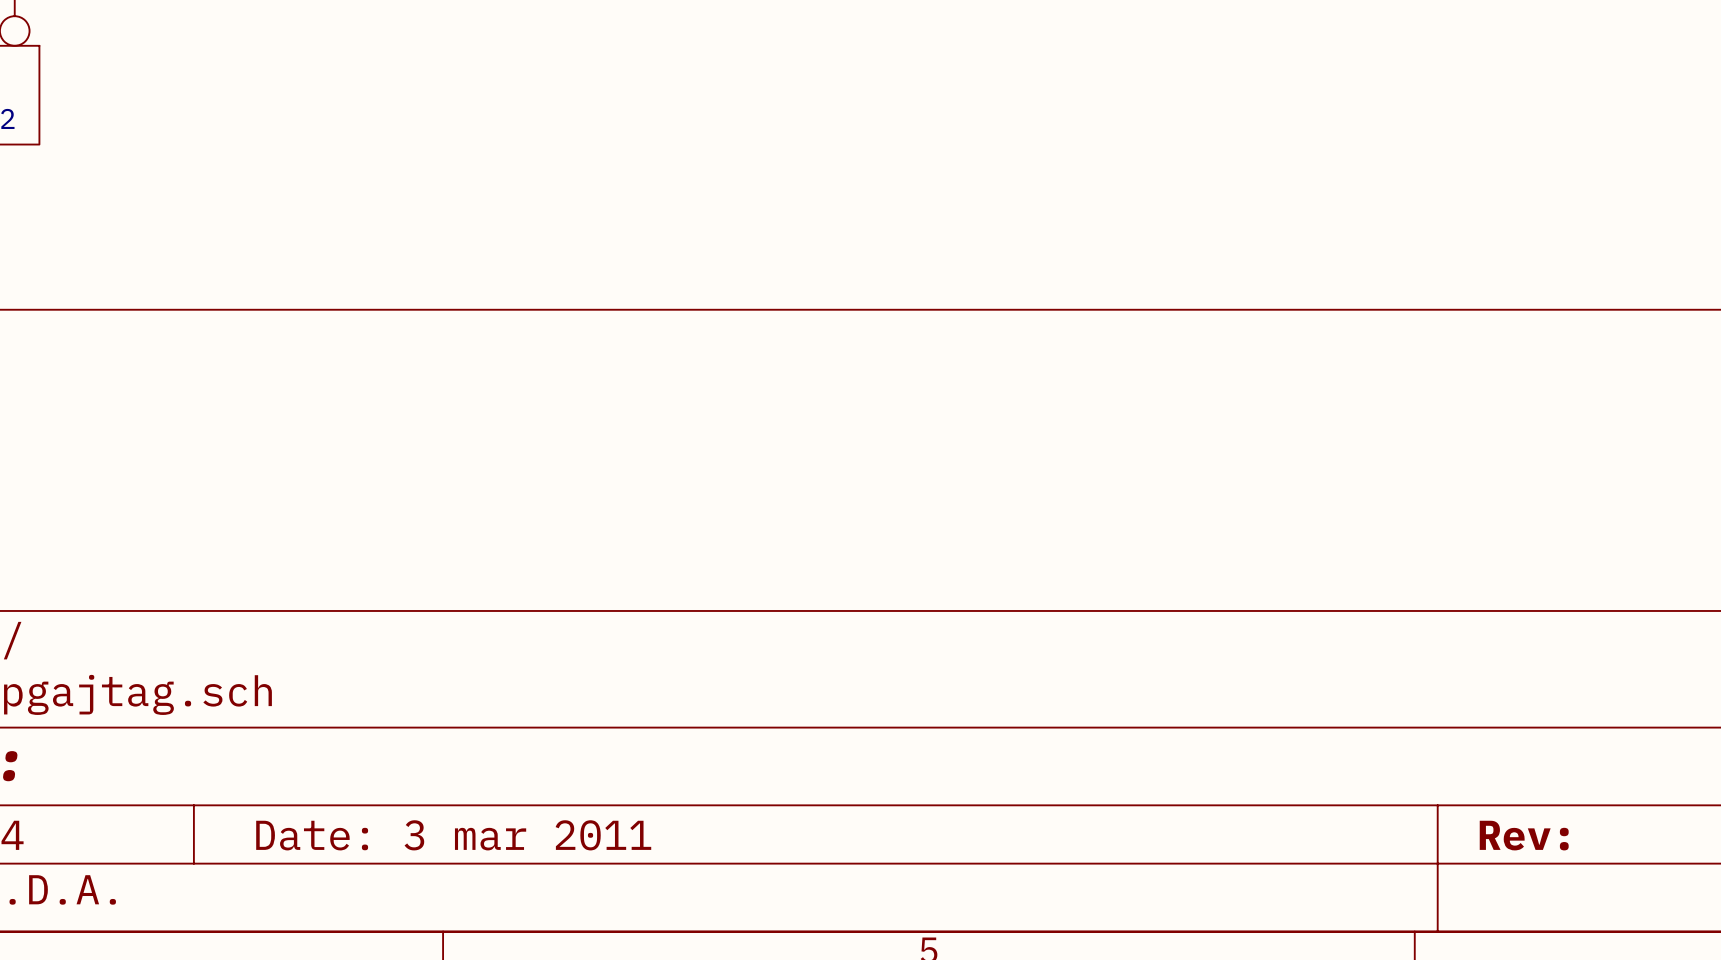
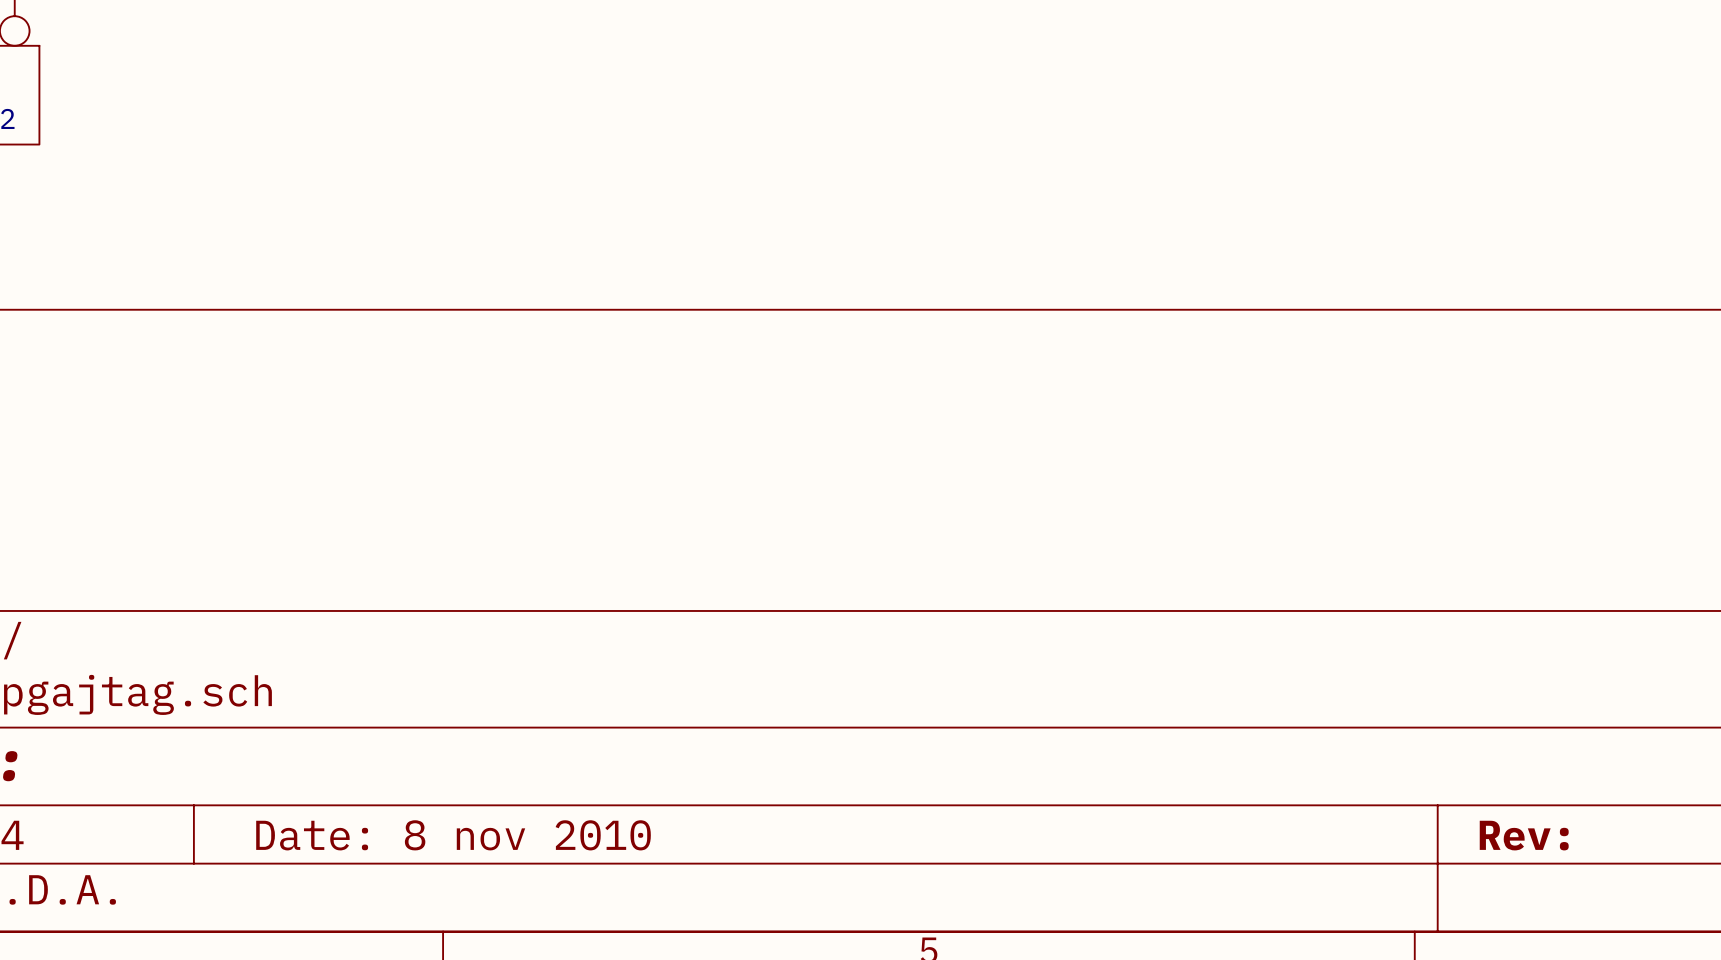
title block: Date: 3 mar 2011 (453, 835) -> Date: 8 nov 2010 (453, 835)

